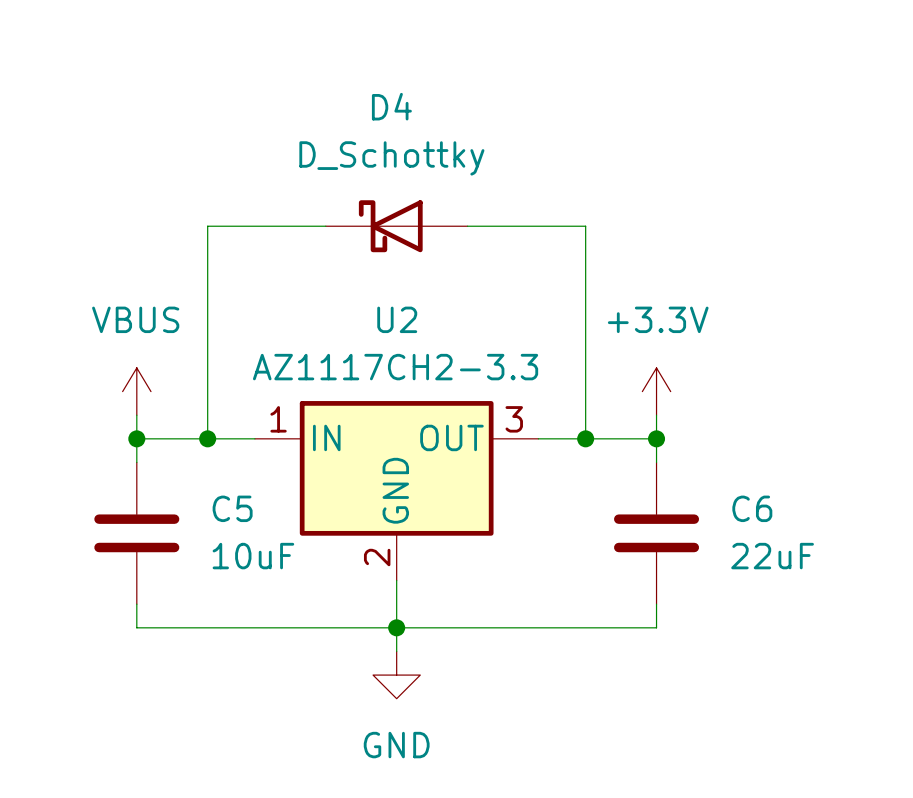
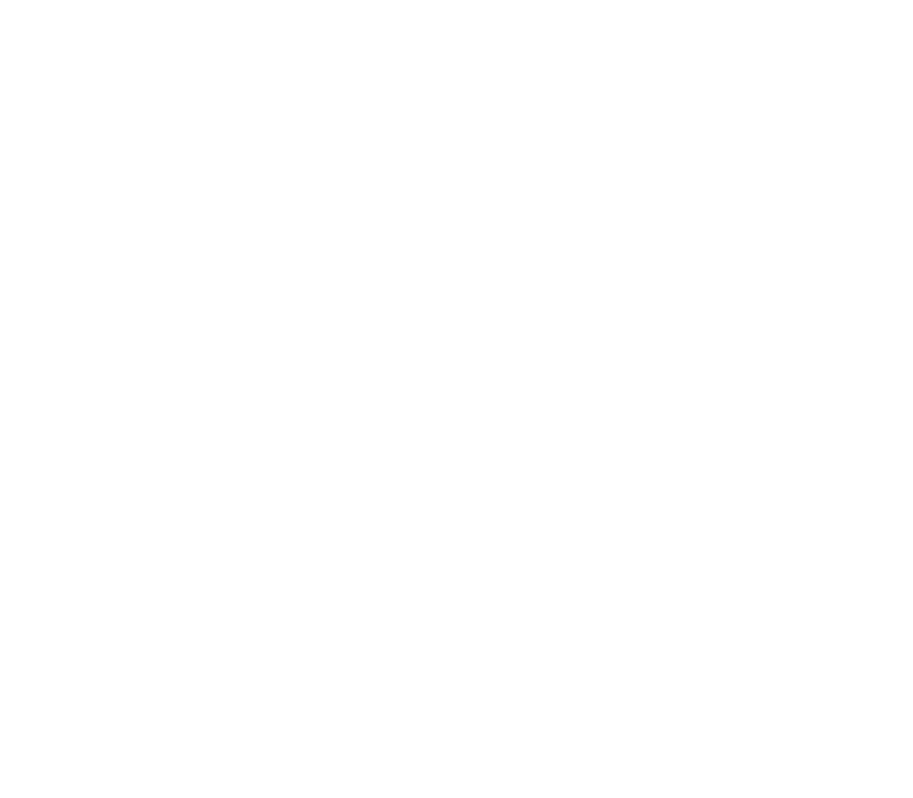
wire: (325, 226) (207, 226) (207, 438) -> none
D4: D_Schottky (396, 226) -> none
wire: (467, 226) (585, 226) (585, 438) -> none
power symbol: VBUS (136, 391) -> none
power symbol: +3.3V (656, 391) -> none
wire: (136, 415) (136, 462) -> none
wire: (656, 415) (656, 462) -> none
wire: (136, 438) (254, 438) -> none
junction: (136, 438) -> none
junction: (207, 438) -> none
wire: (538, 438) (656, 438) -> none
junction: (585, 438) -> none
junction: (656, 438) -> none
U2: AZ1117CH2-3.3 (396, 490) -> none
C5: 10uF (136, 533) -> none
C6: 22uF (656, 533) -> none
wire: (396, 580) (396, 651) -> none
wire: (136, 604) (136, 627) (656, 627) (656, 604) -> none
junction: (396, 627) -> none
power symbol: GND (396, 675) -> none

